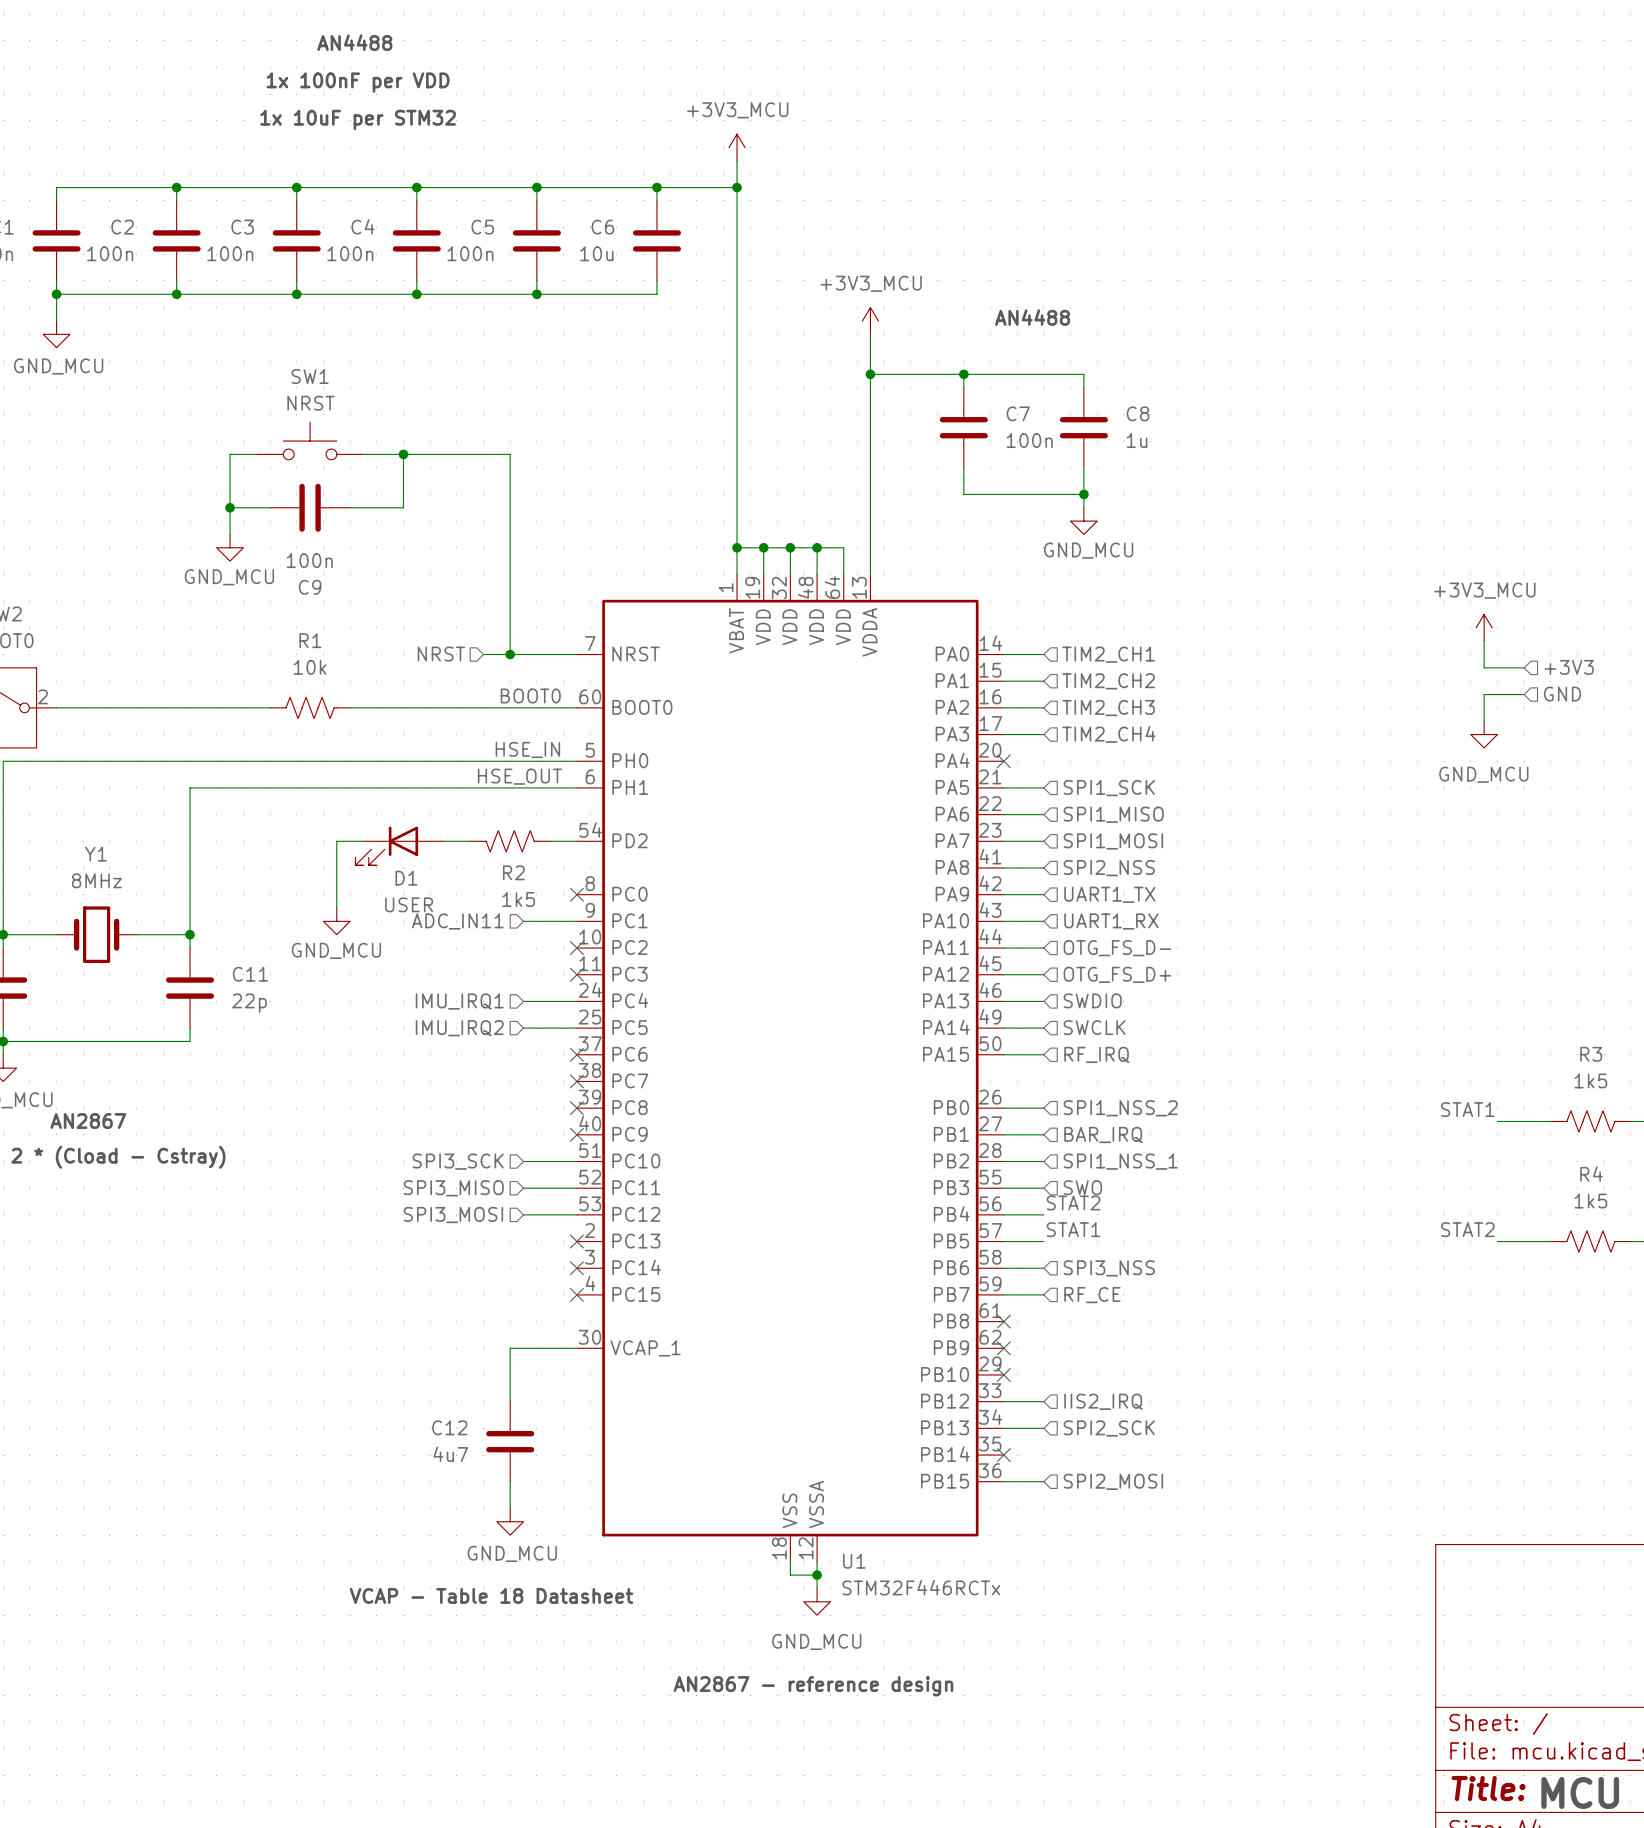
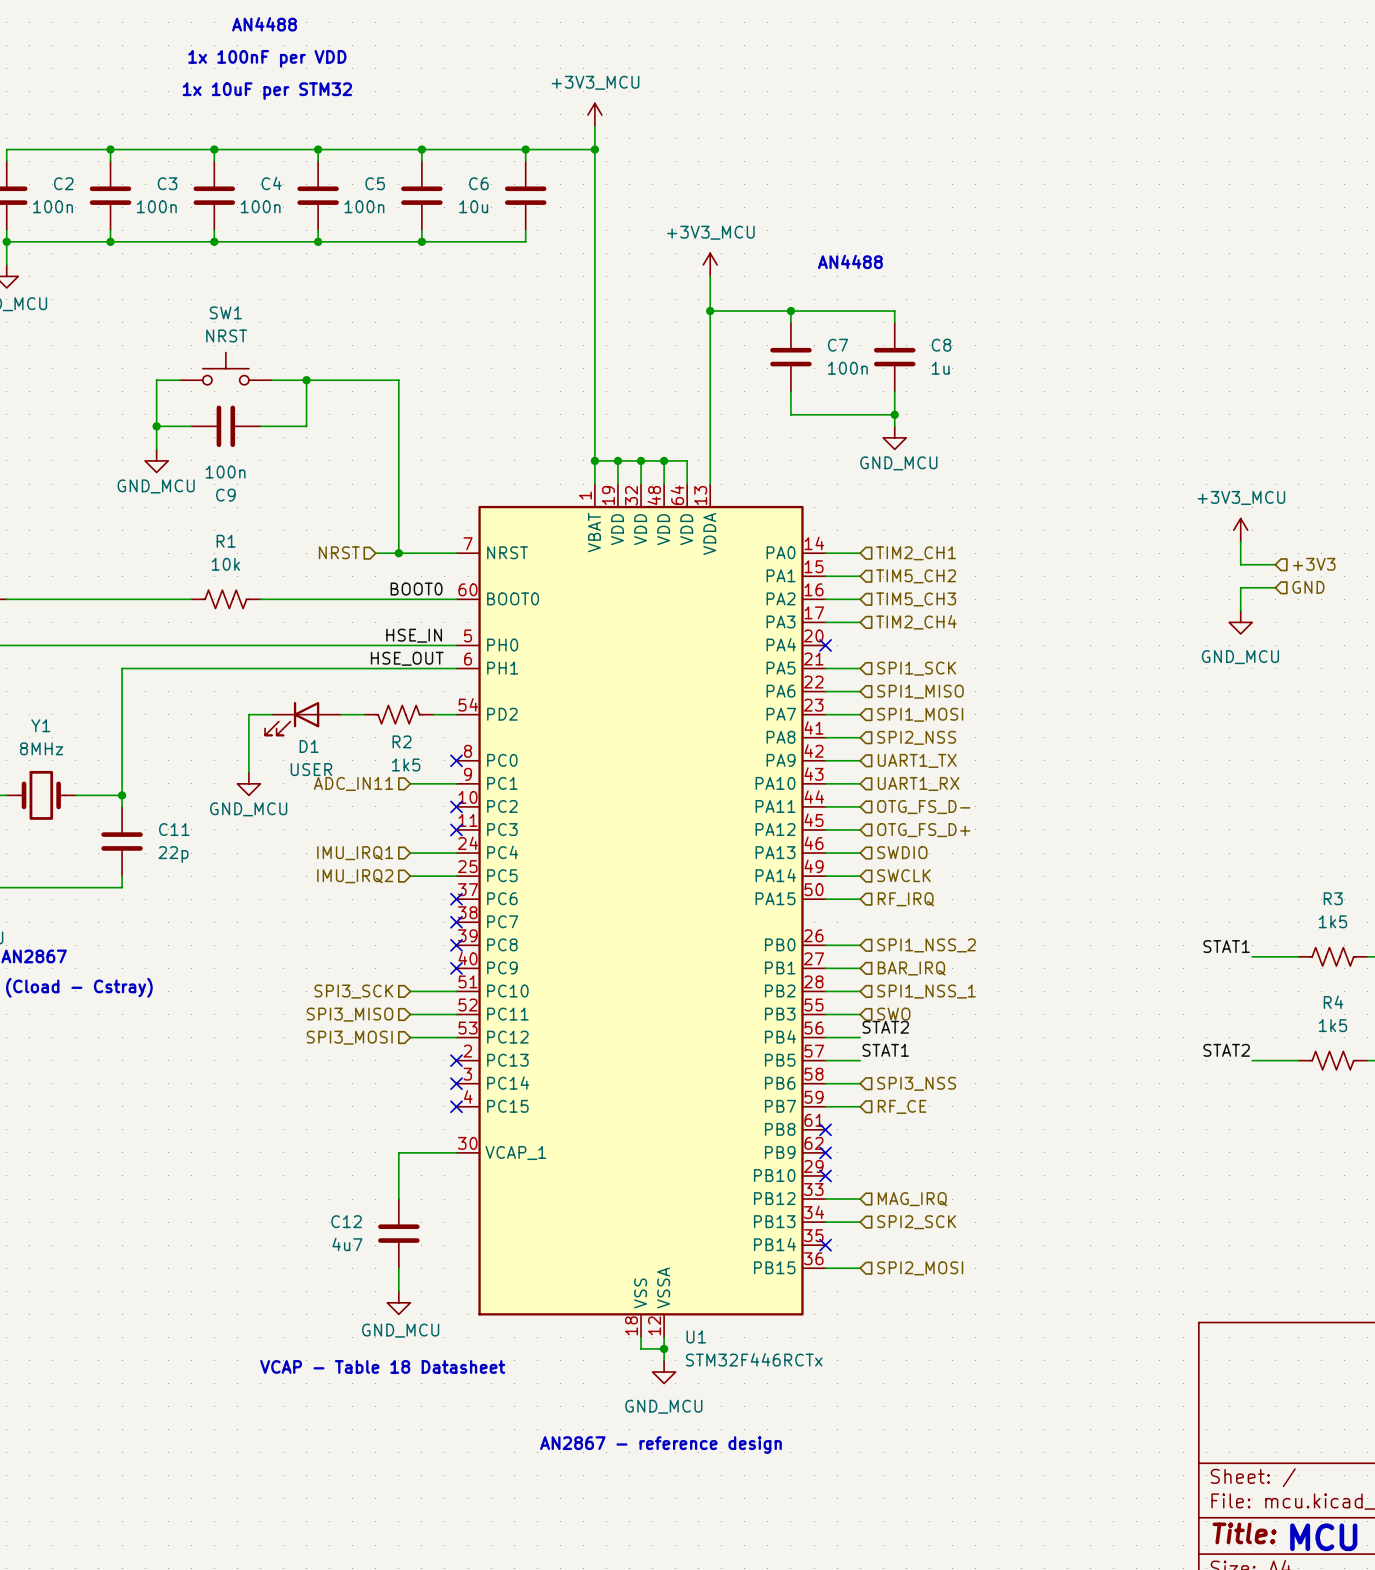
hierarchical label: TIM2_CH2 (1108, 681) -> TIM5_CH2 (916, 576)
hierarchical label: TIM2_CH3 (1108, 708) -> TIM5_CH3 (916, 599)
hierarchical label: IIS2_IRQ (1103, 1401) -> MAG_IRQ (912, 1199)

